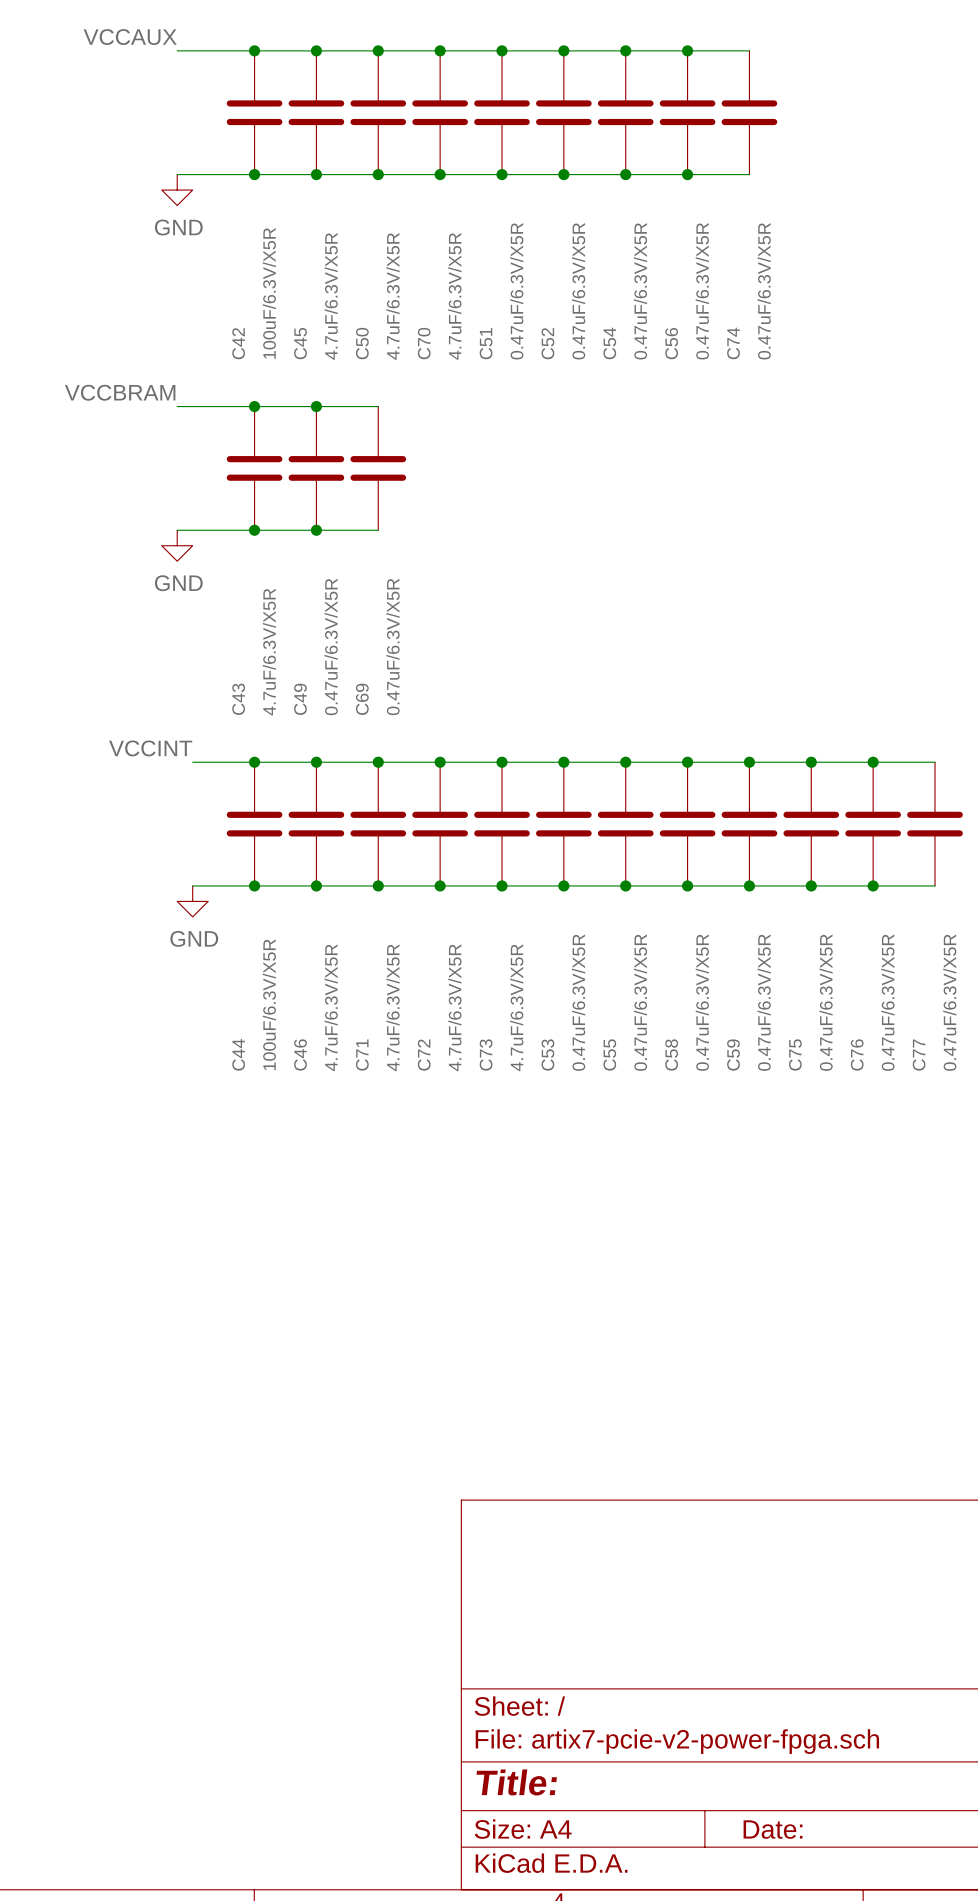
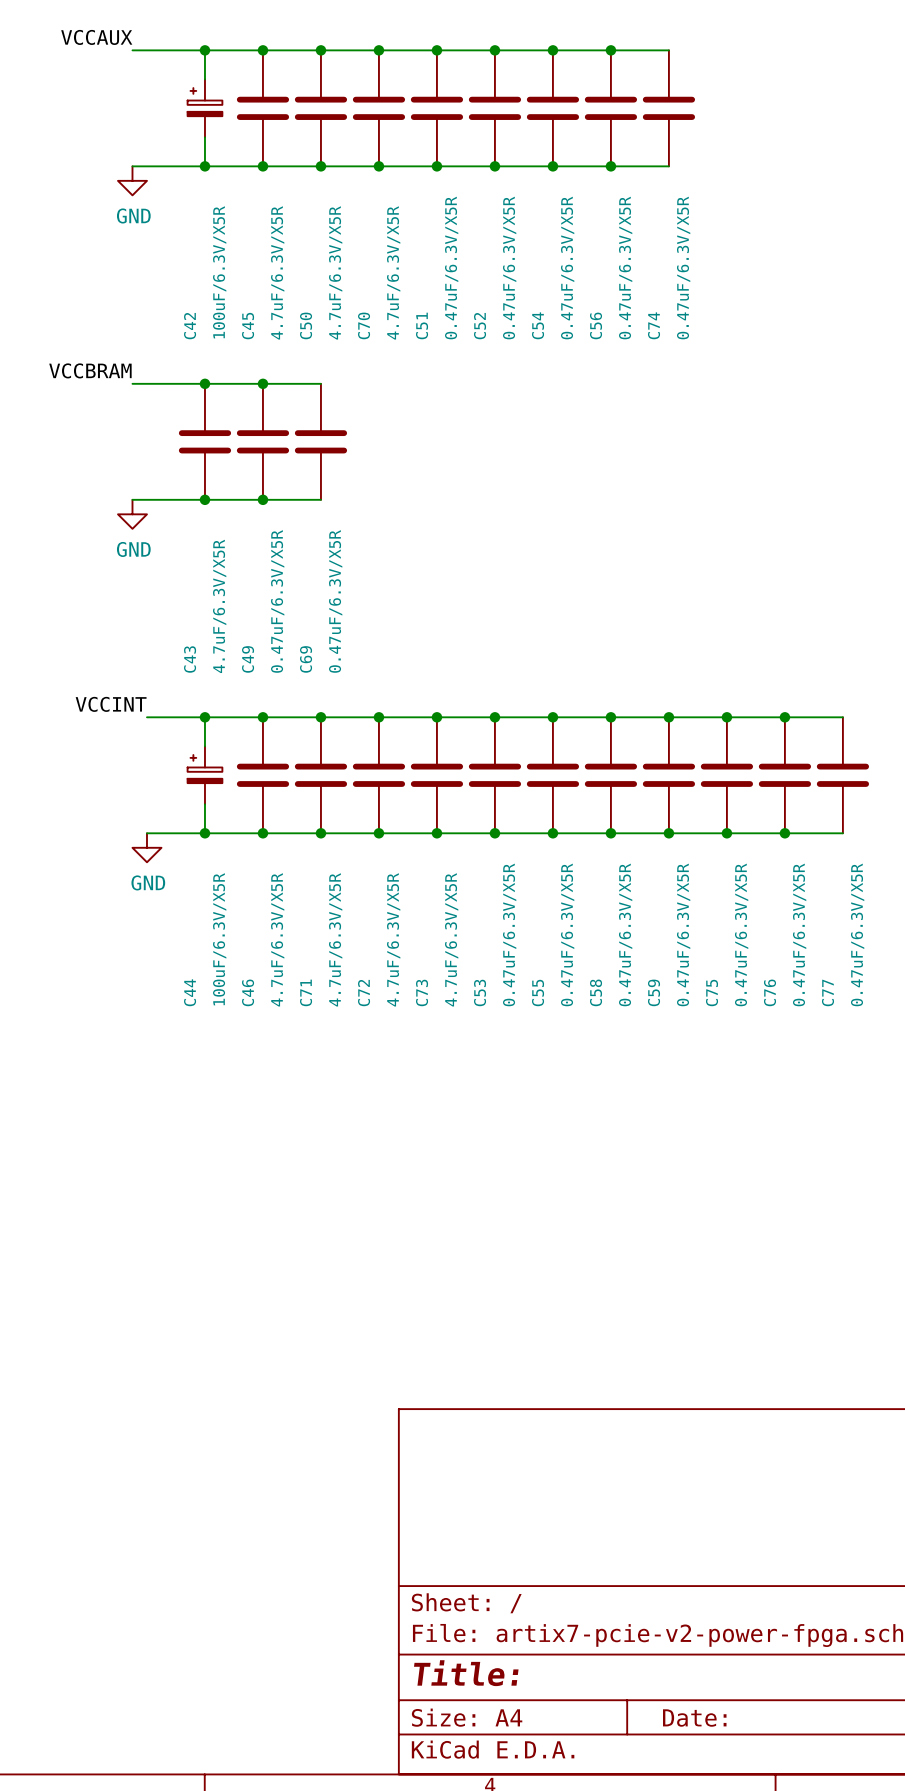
C42 symbol: [226, 50, 283, 175] -> [187, 79, 223, 138]
C44 symbol: [226, 762, 283, 886] -> [187, 746, 223, 805]

